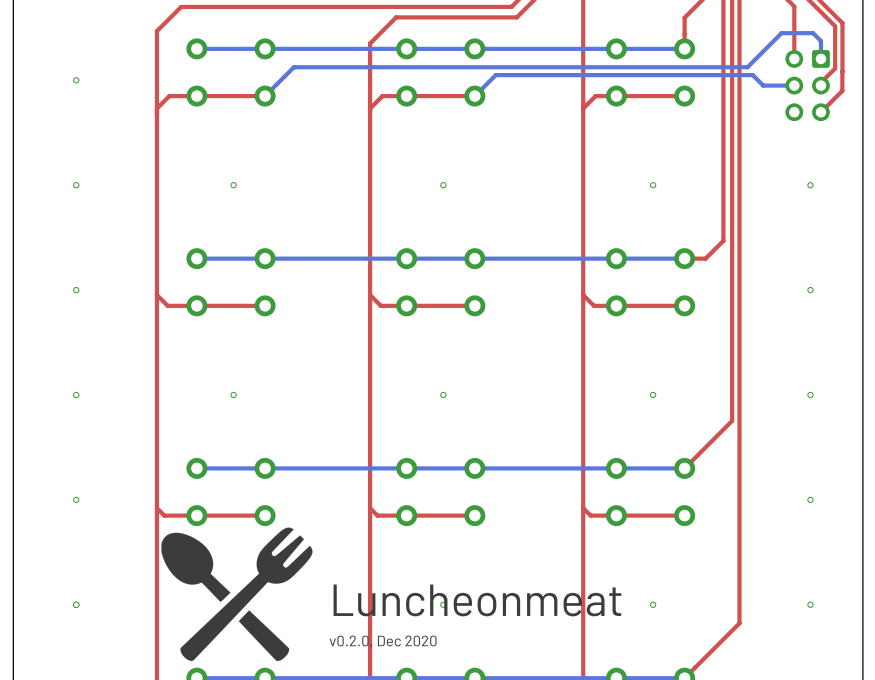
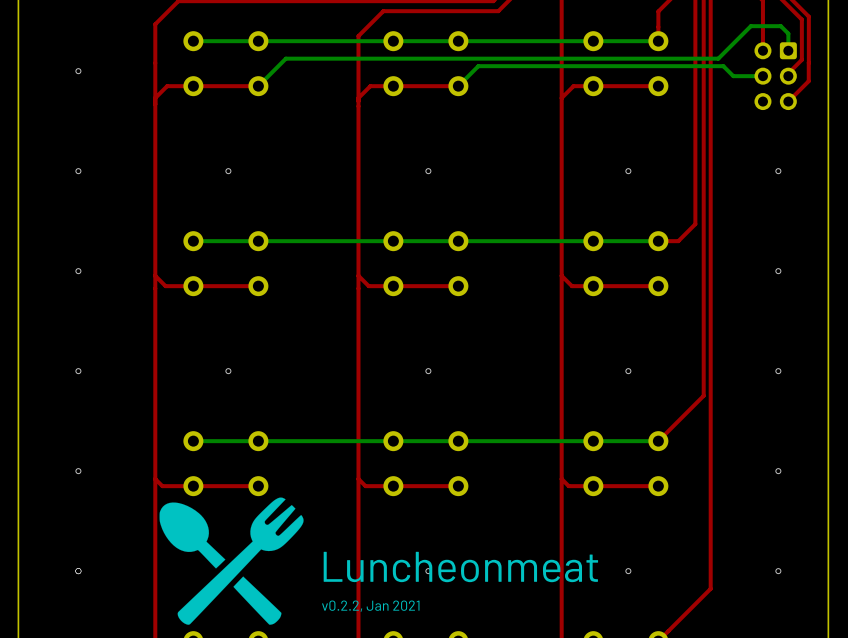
text: v0.2.0, Dec 2020 (383, 641) -> v0.2.2, Jan 2021 (370, 606)

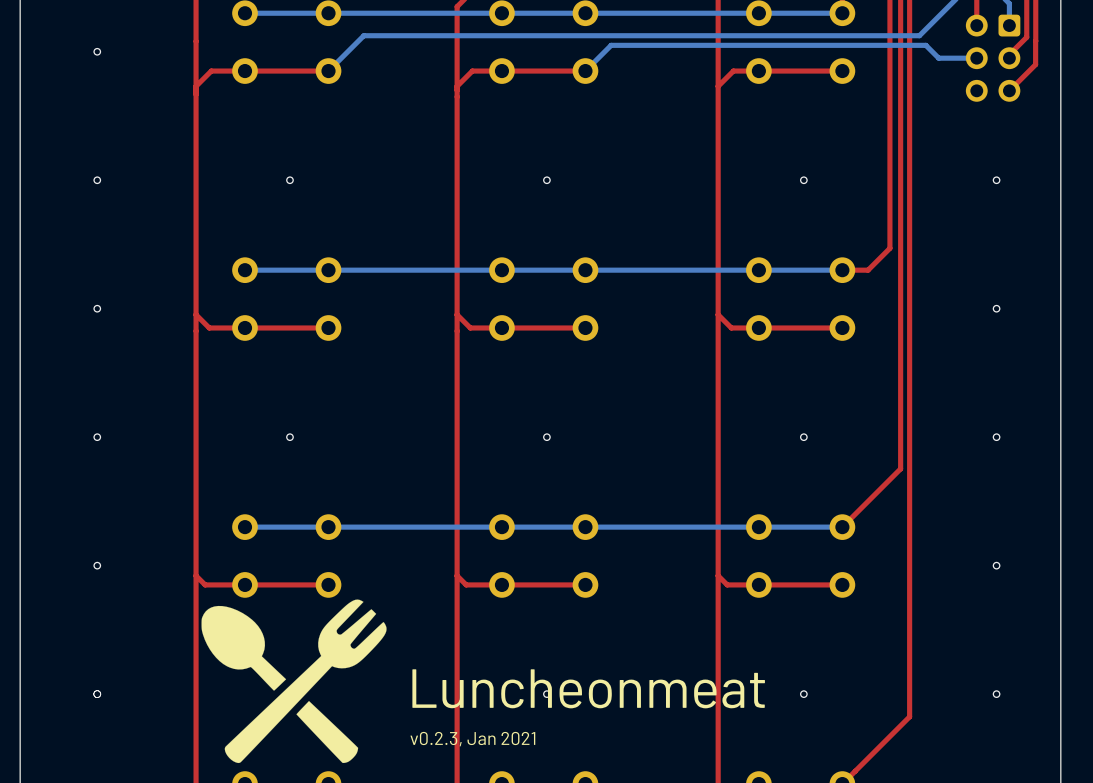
text: v0.2.2, Jan 2021 (370, 606) -> v0.2.3, Jan 2021 (472, 739)

